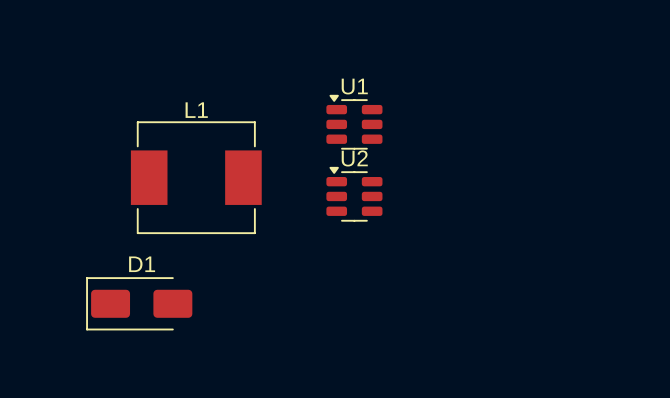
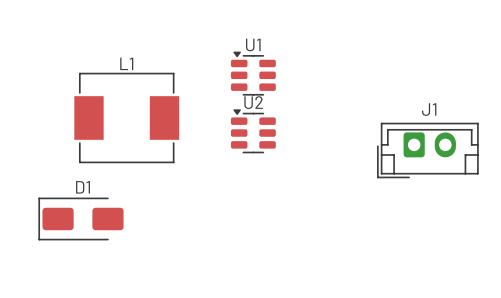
J1: none -> (427, 150)

